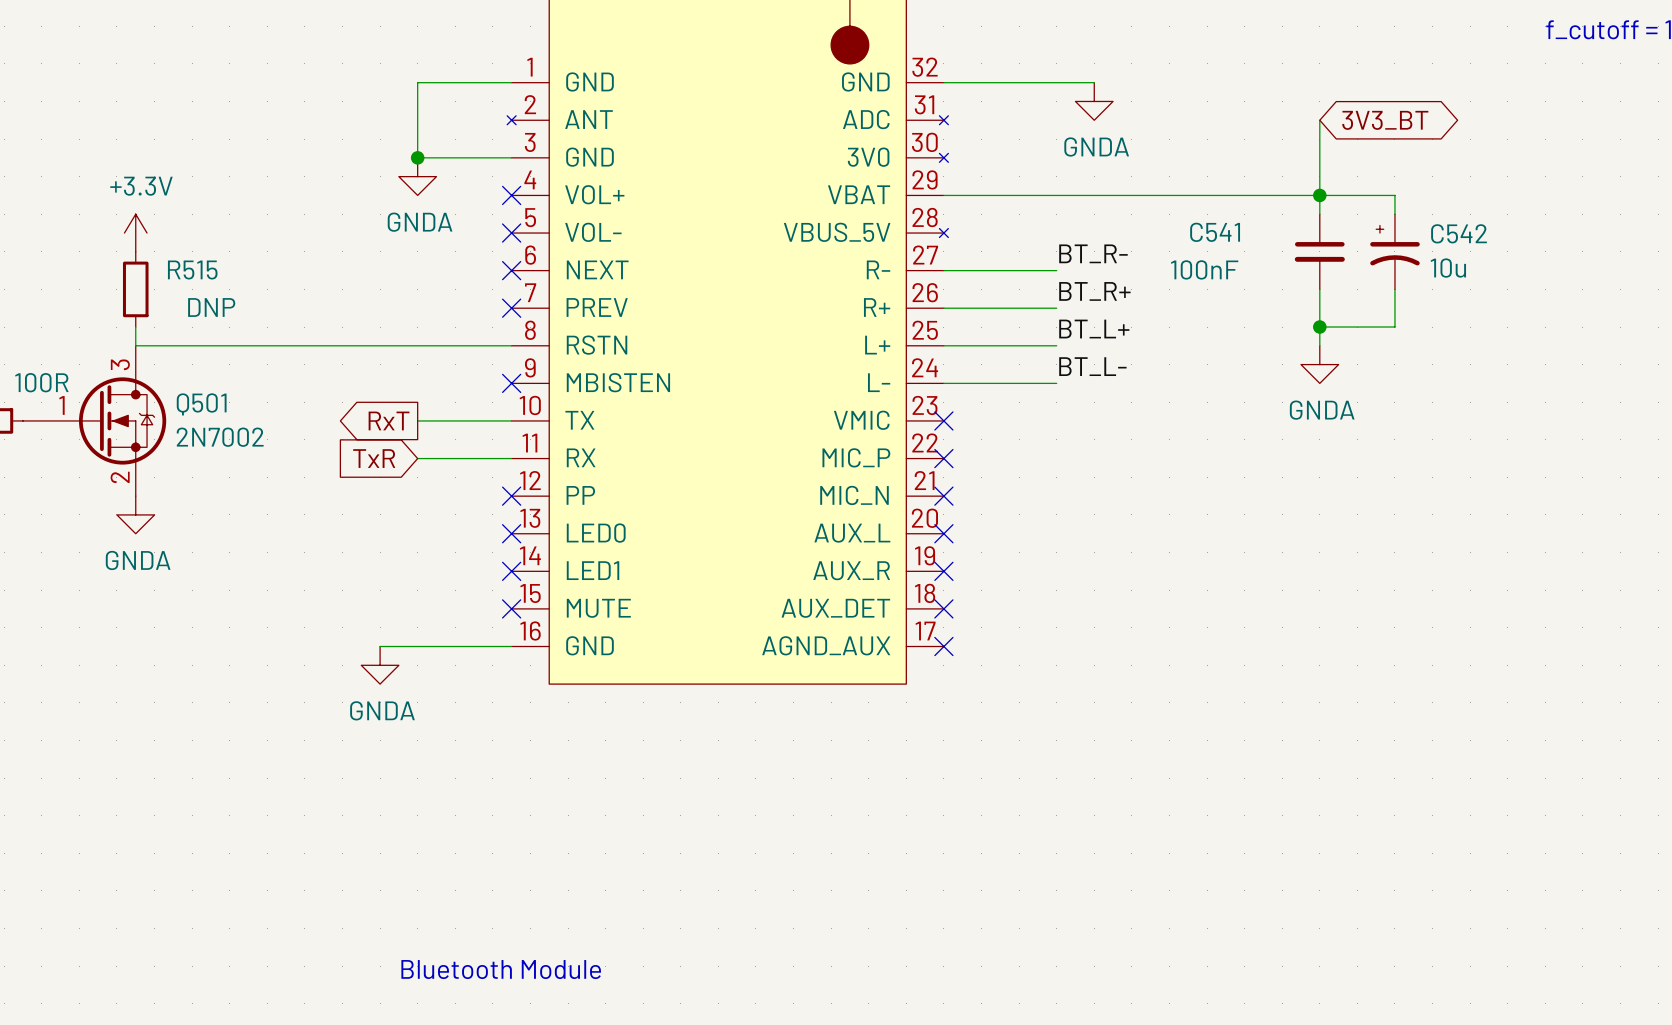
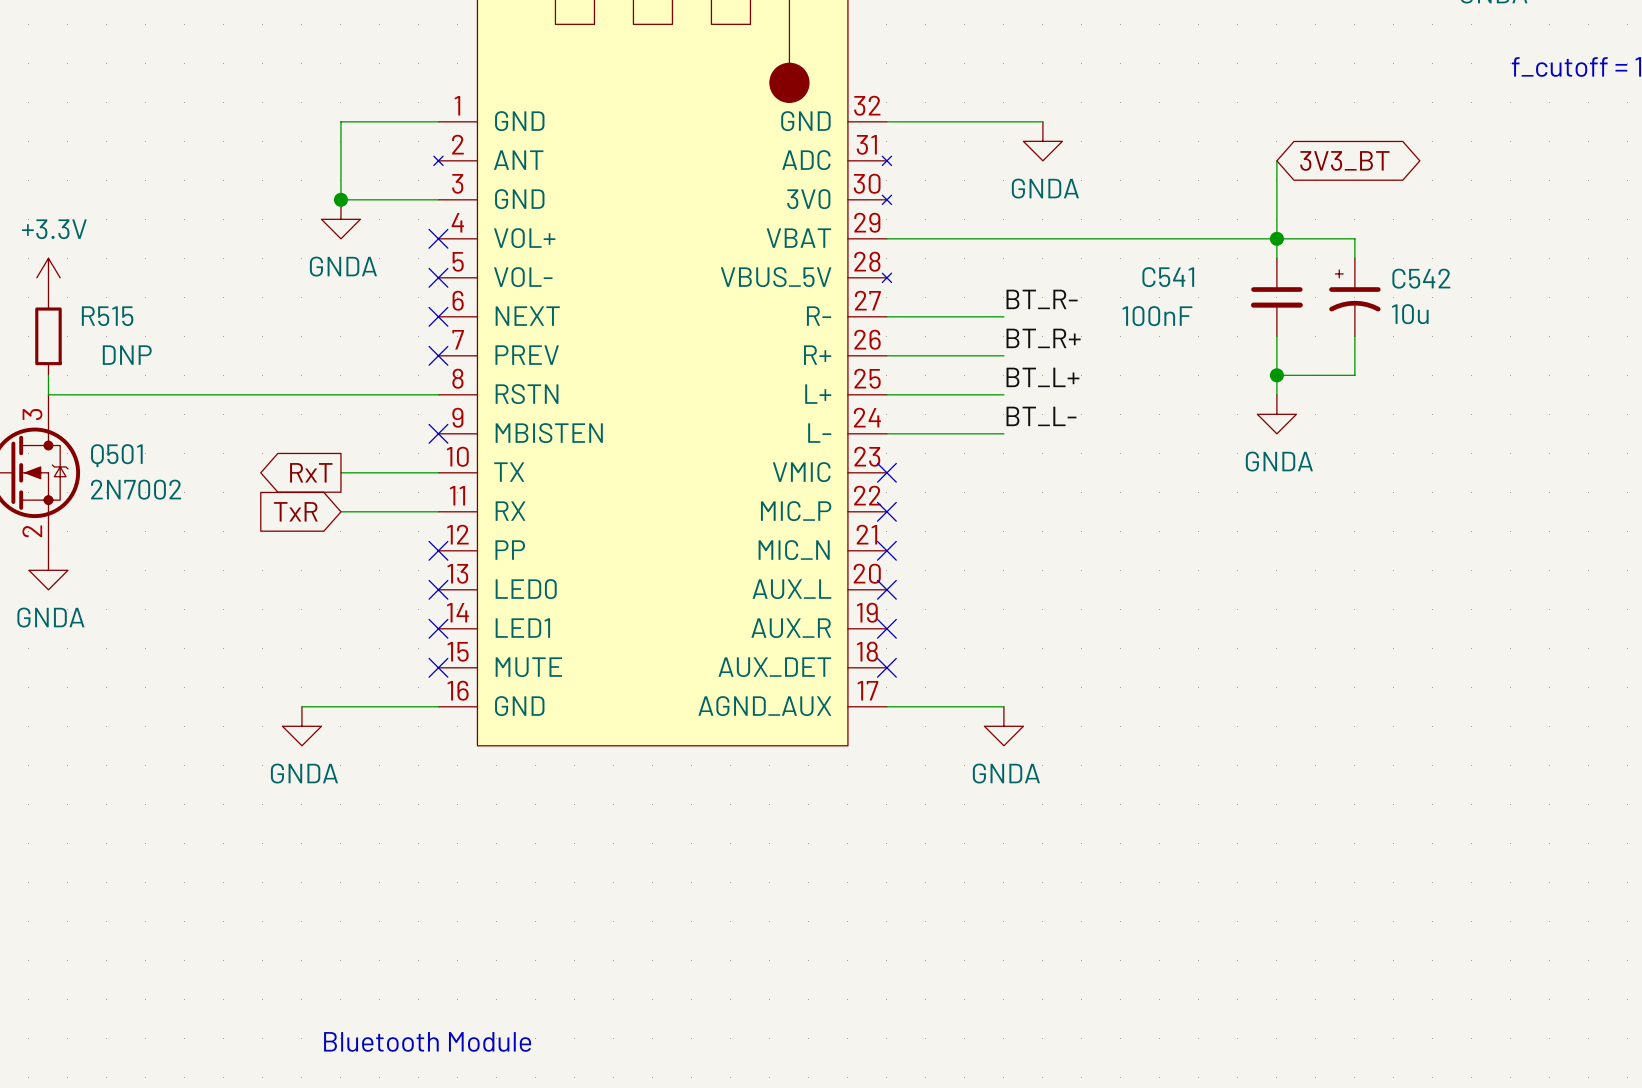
wire: none -> (886, 706) (1003, 706)
no-connect mark: (943, 646) -> none
power symbol: none -> GNDA (1003, 726)

